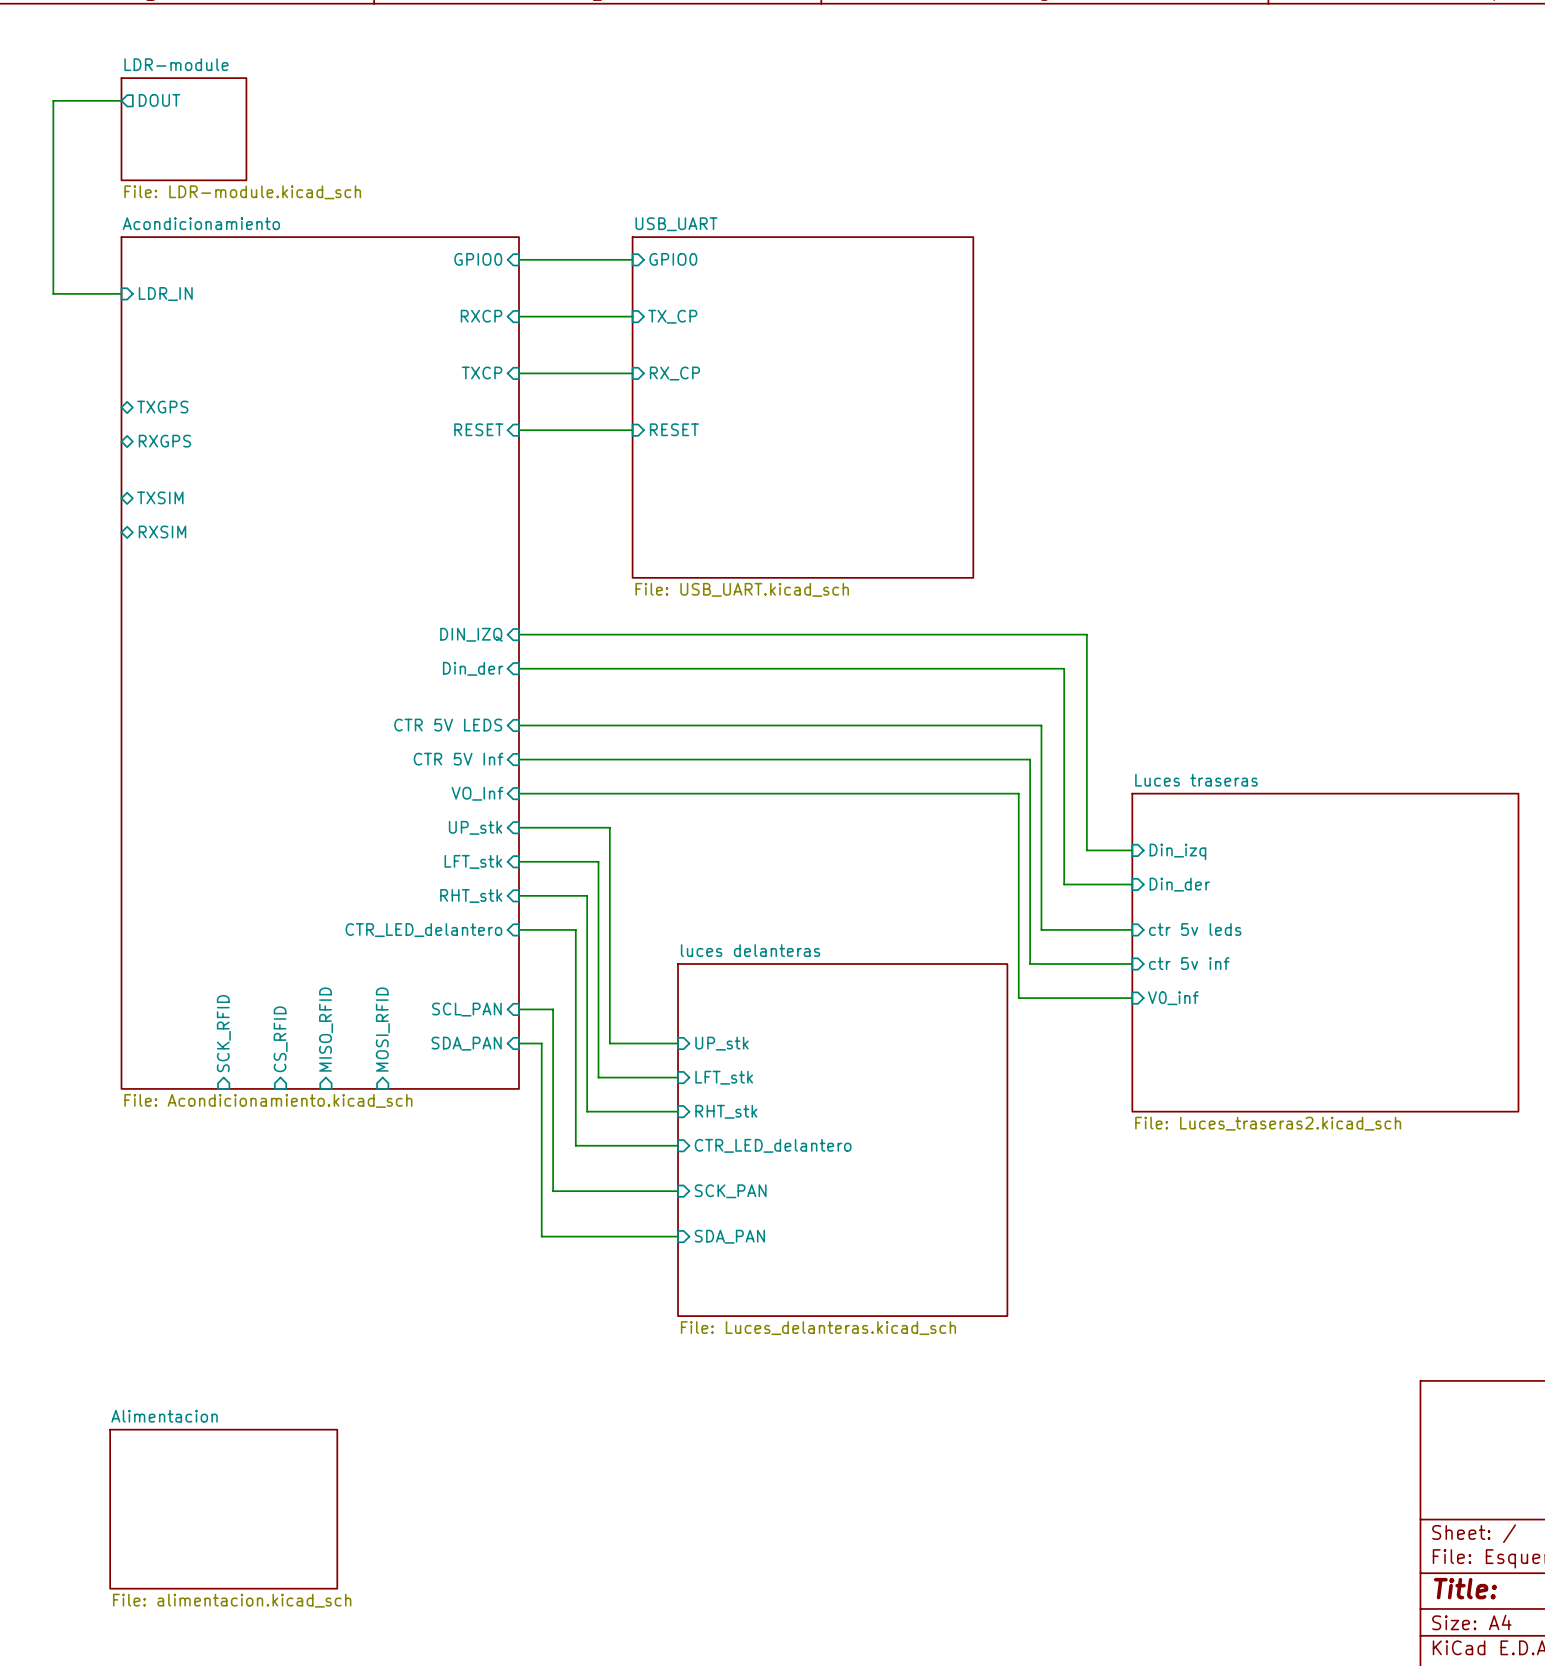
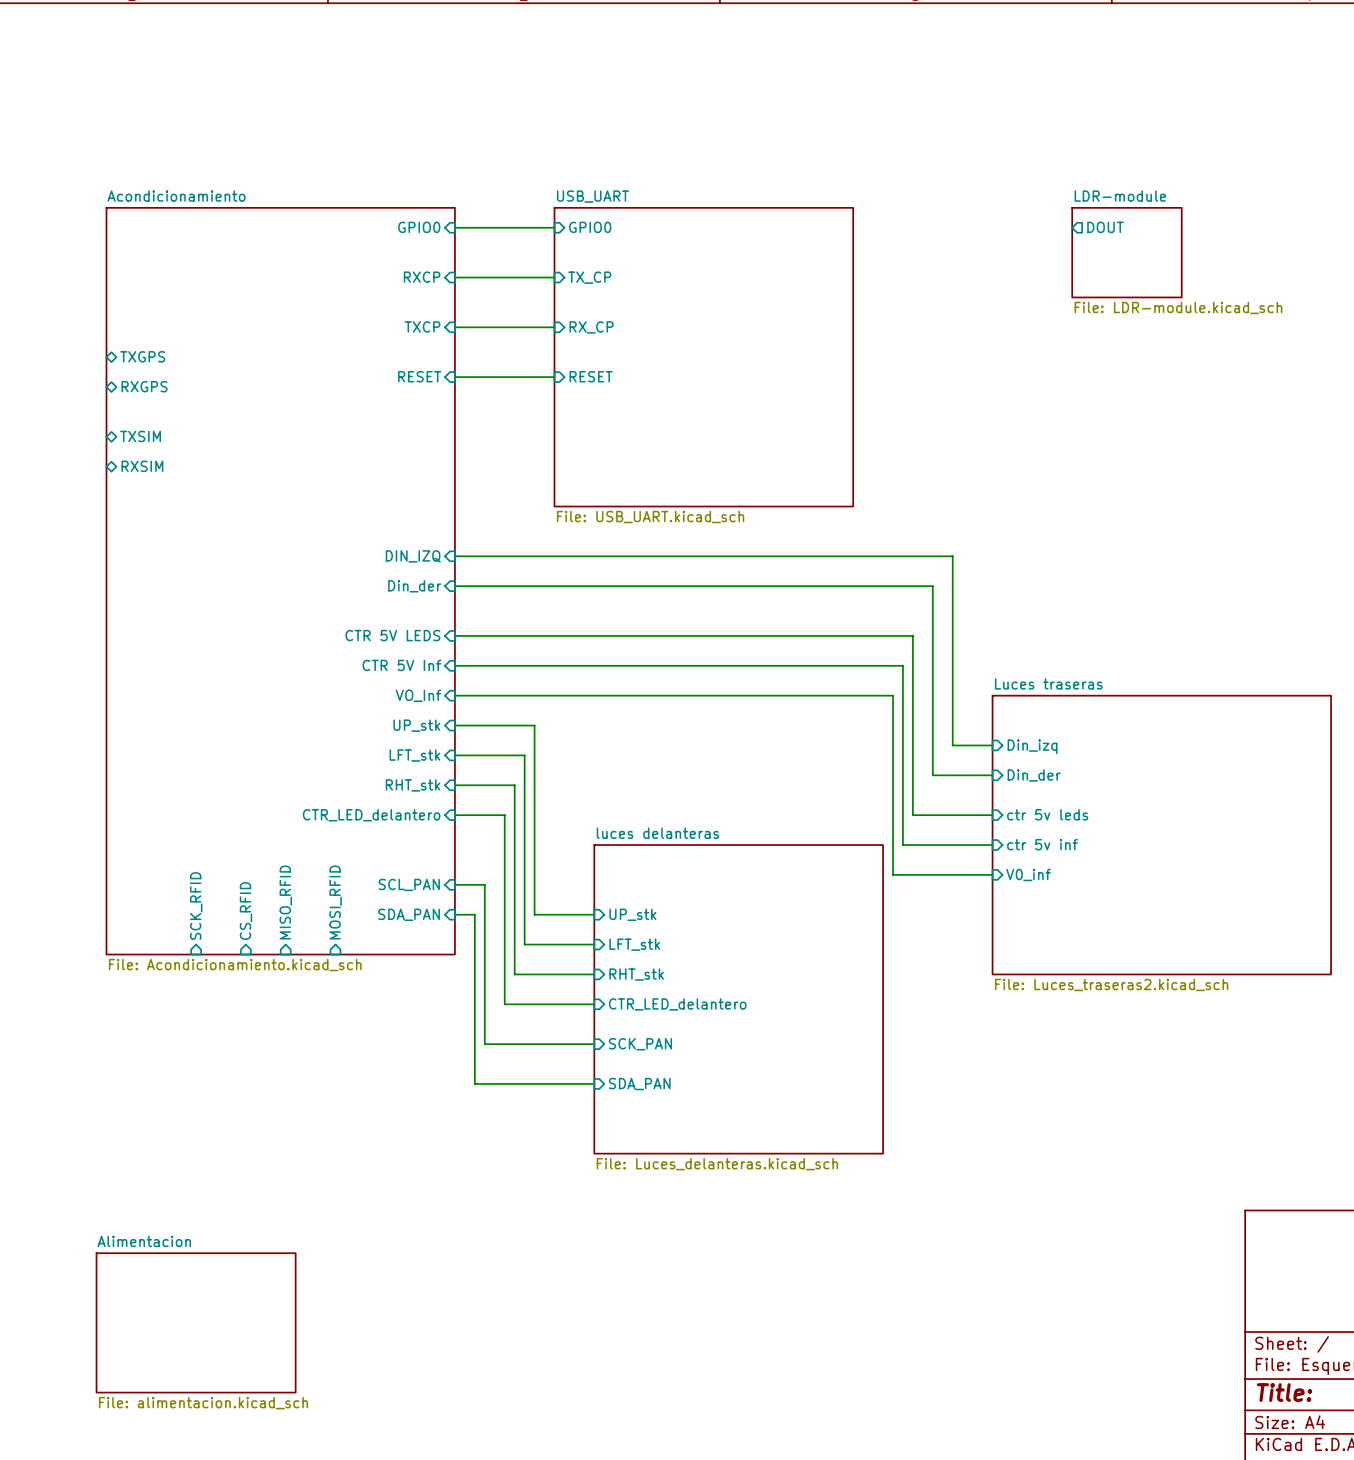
wire: (121, 100) (53, 100) (53, 293) (121, 293) -> none
sheet pin: DOUT (159, 100) -> none
sheet LDR-module: File: LDR-module.kicad_sch (183, 129) -> none
sheet pin: none -> DOUT (1105, 227)
sheet LDR-module: none -> File: LDR-module.kicad_sch (1126, 252)
sheet pin: LDR_IN (165, 294) -> none

